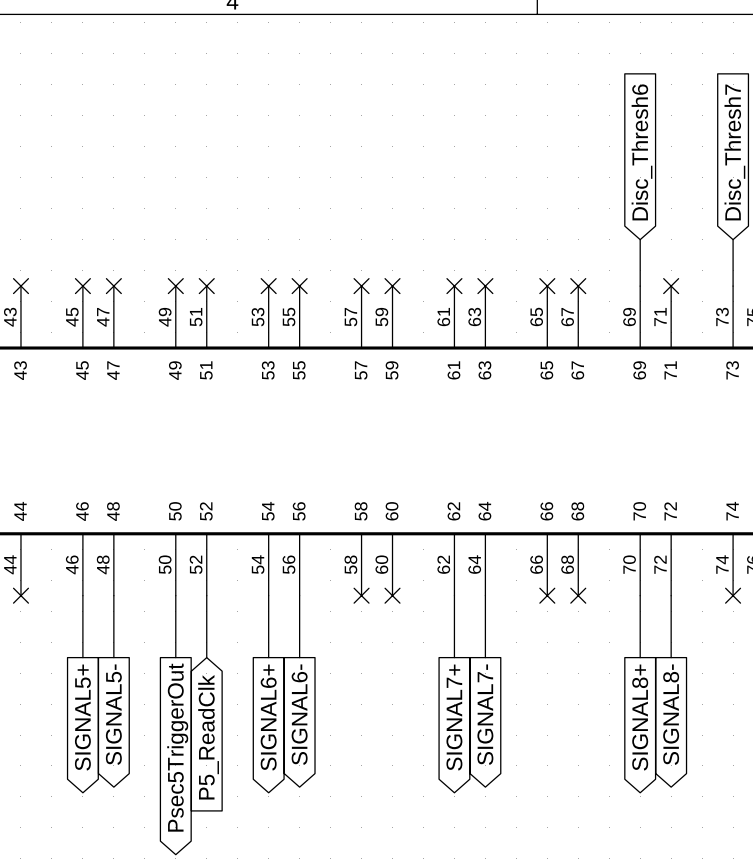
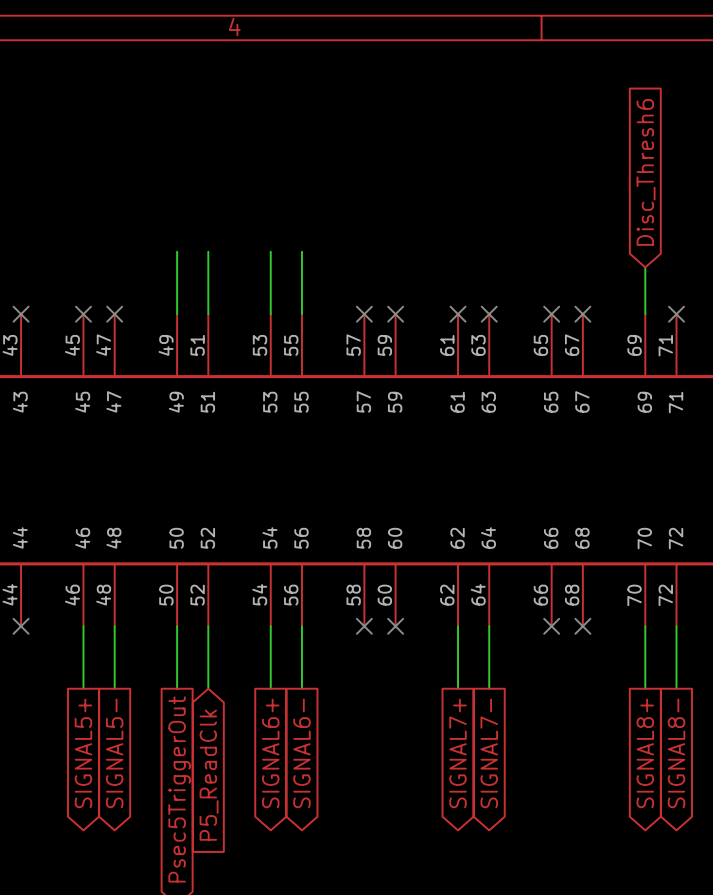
wire: none -> (177, 251) (177, 314)
wire: none -> (208, 251) (208, 314)
wire: none -> (270, 251) (270, 314)
wire: none -> (301, 251) (301, 314)
no-connect mark: (175, 286) -> none
no-connect mark: (206, 286) -> none
no-connect mark: (268, 286) -> none
no-connect mark: (299, 286) -> none

